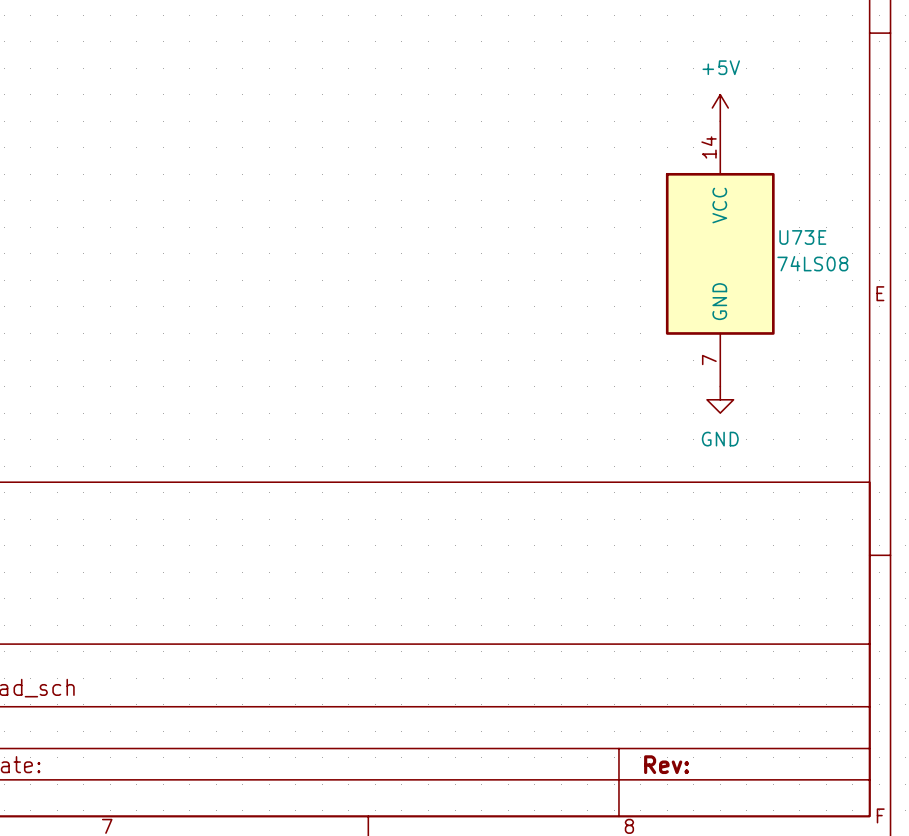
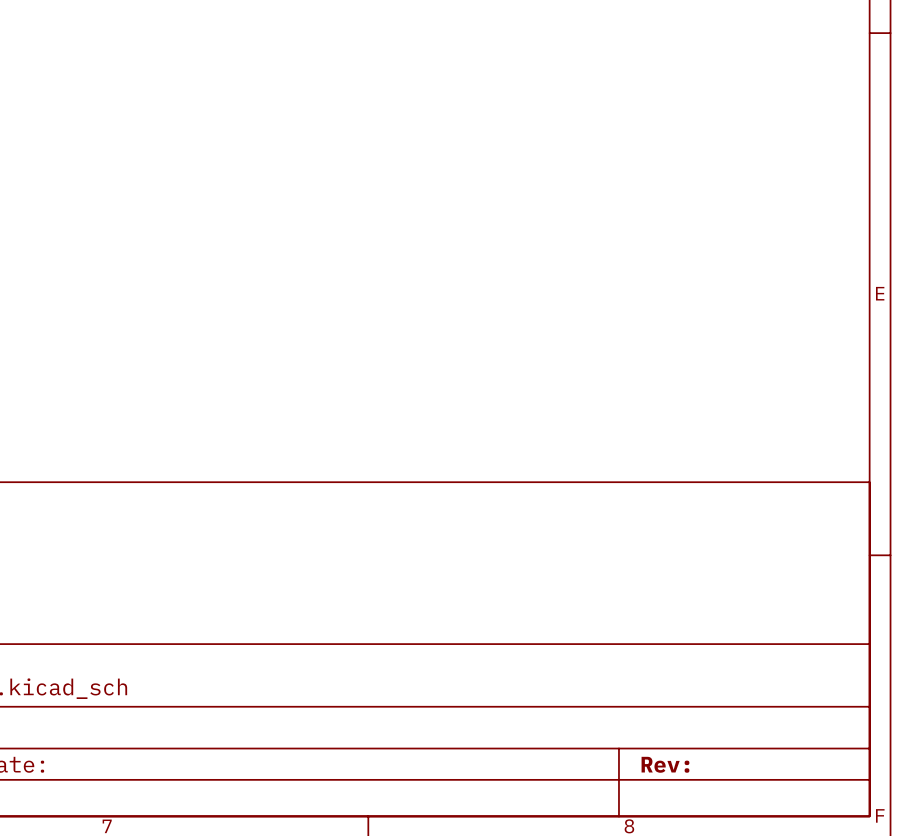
power symbol: +5V (720, 107) -> none
U73E: 74LS08 (720, 253) -> none
power symbol: GND (720, 399) -> none

